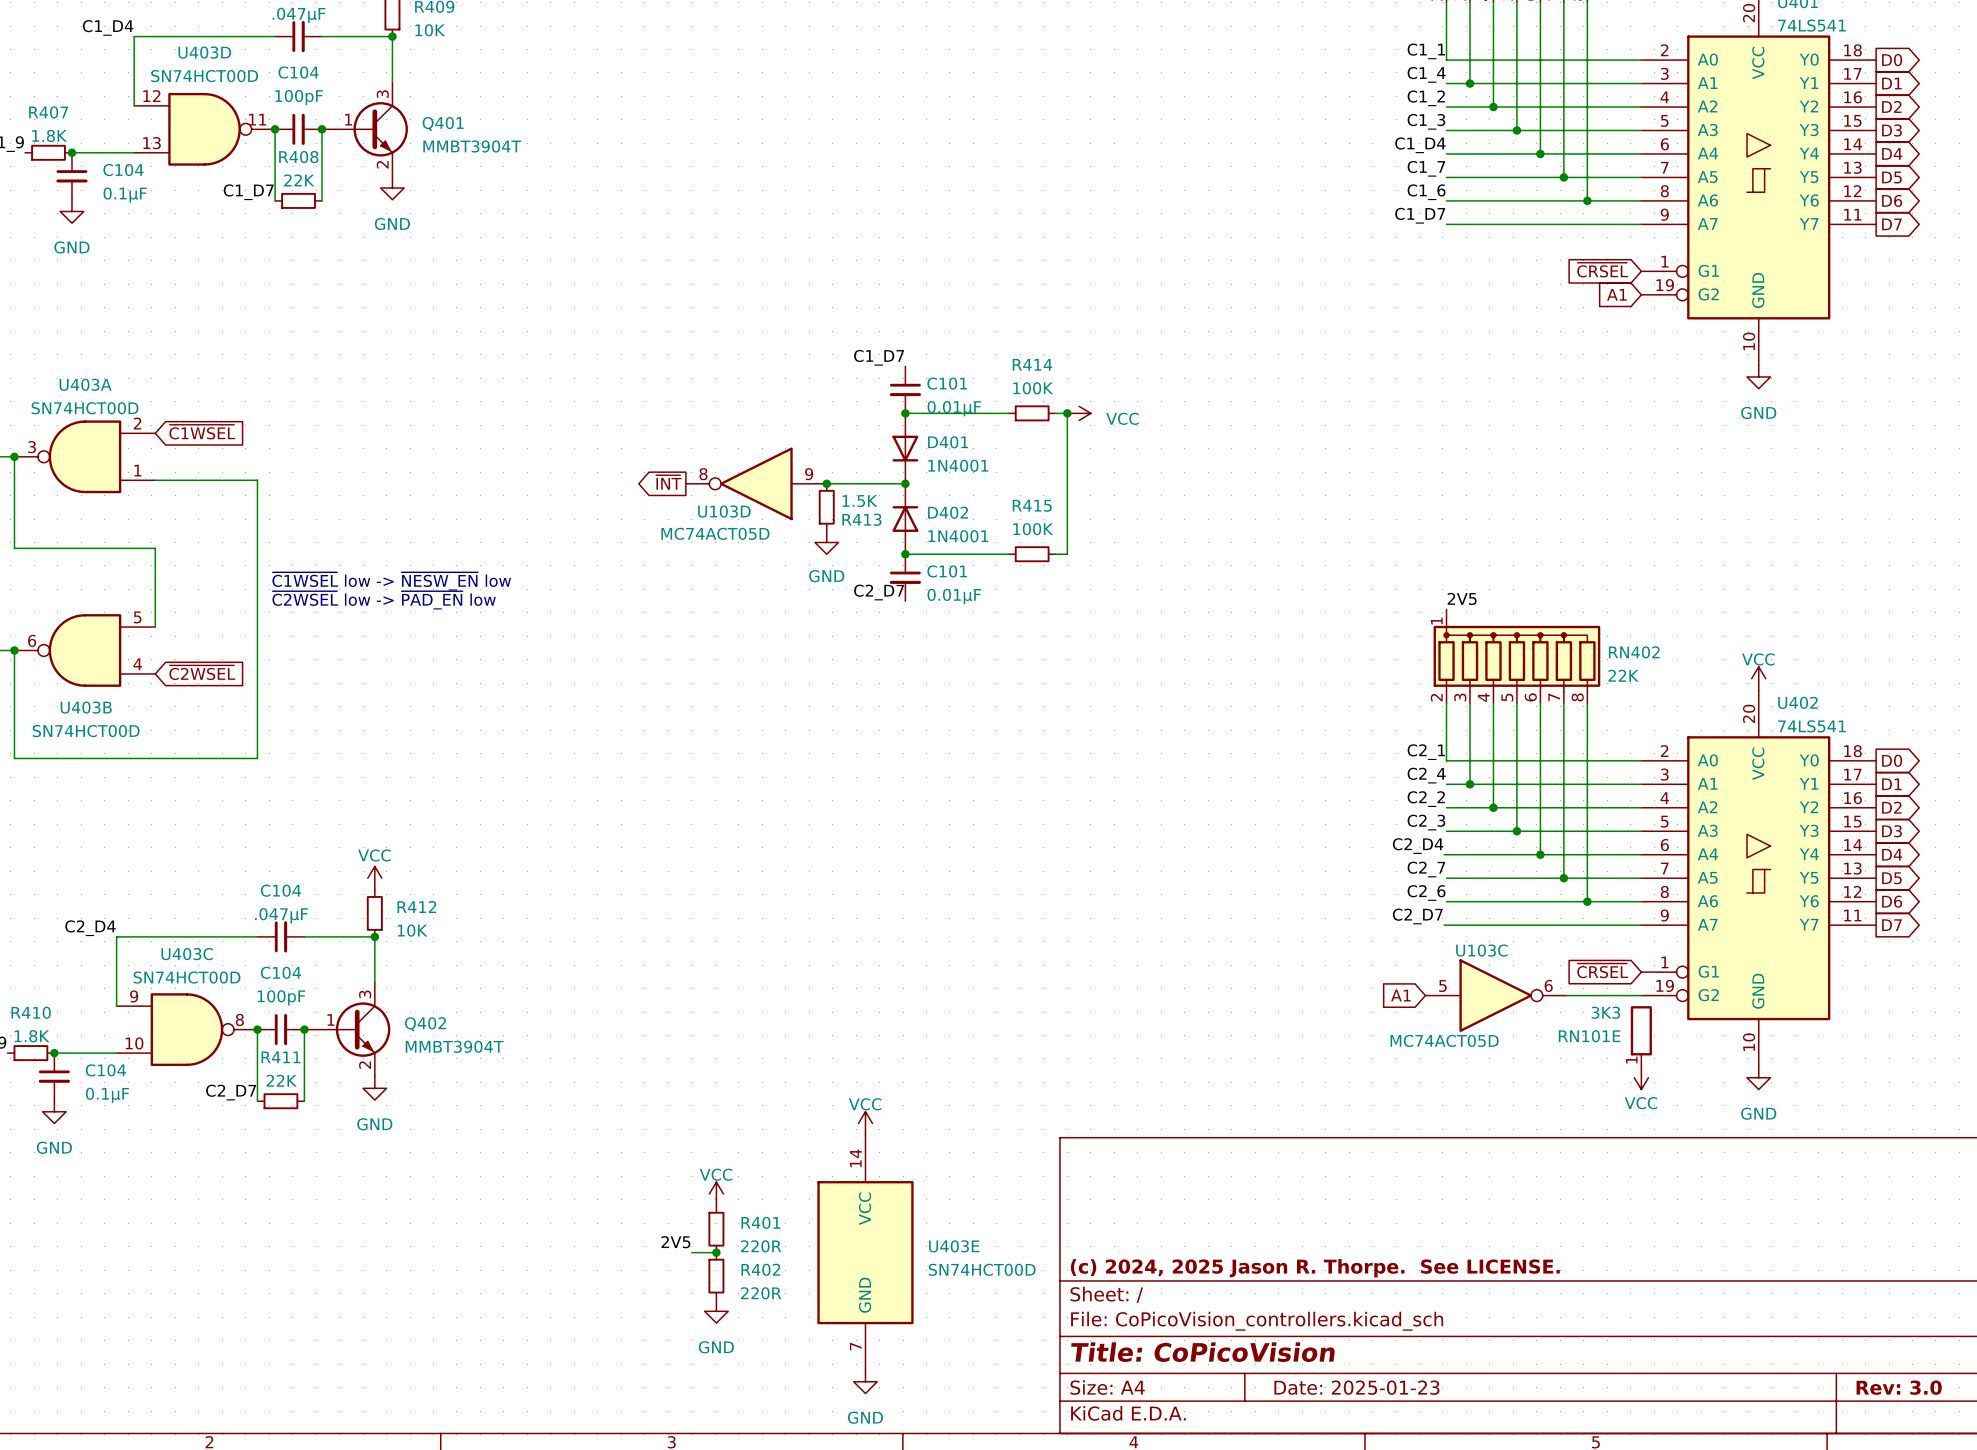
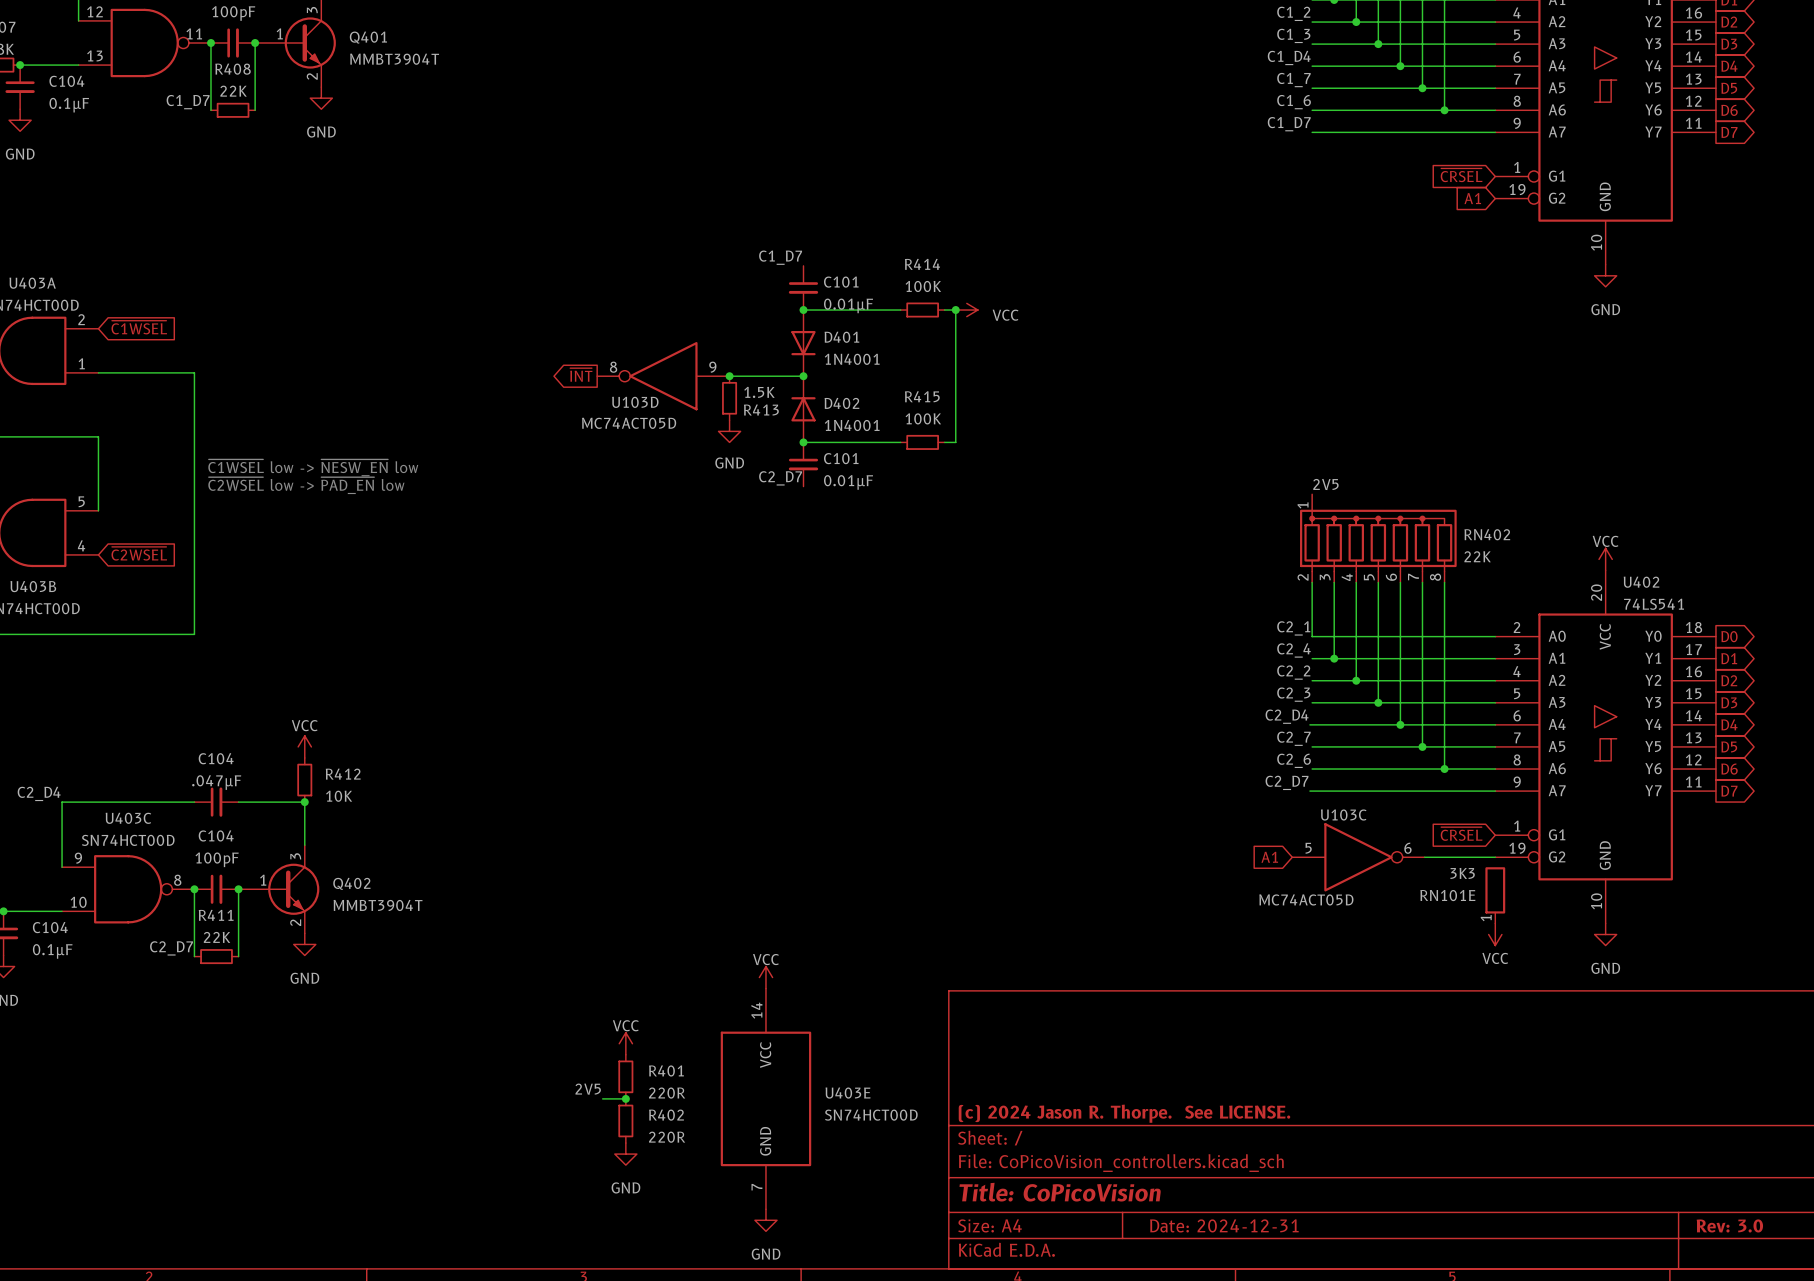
title block: (c) 2024, 2025 Jason R. Thorpe. See LICENSE. (1315, 1268) -> (c) 2024 Jason R. Thorpe. See LICENSE. (1124, 1113)
title block: Date: 2025-01-23 (1356, 1387) -> Date: 2024-12-31 (1224, 1225)

